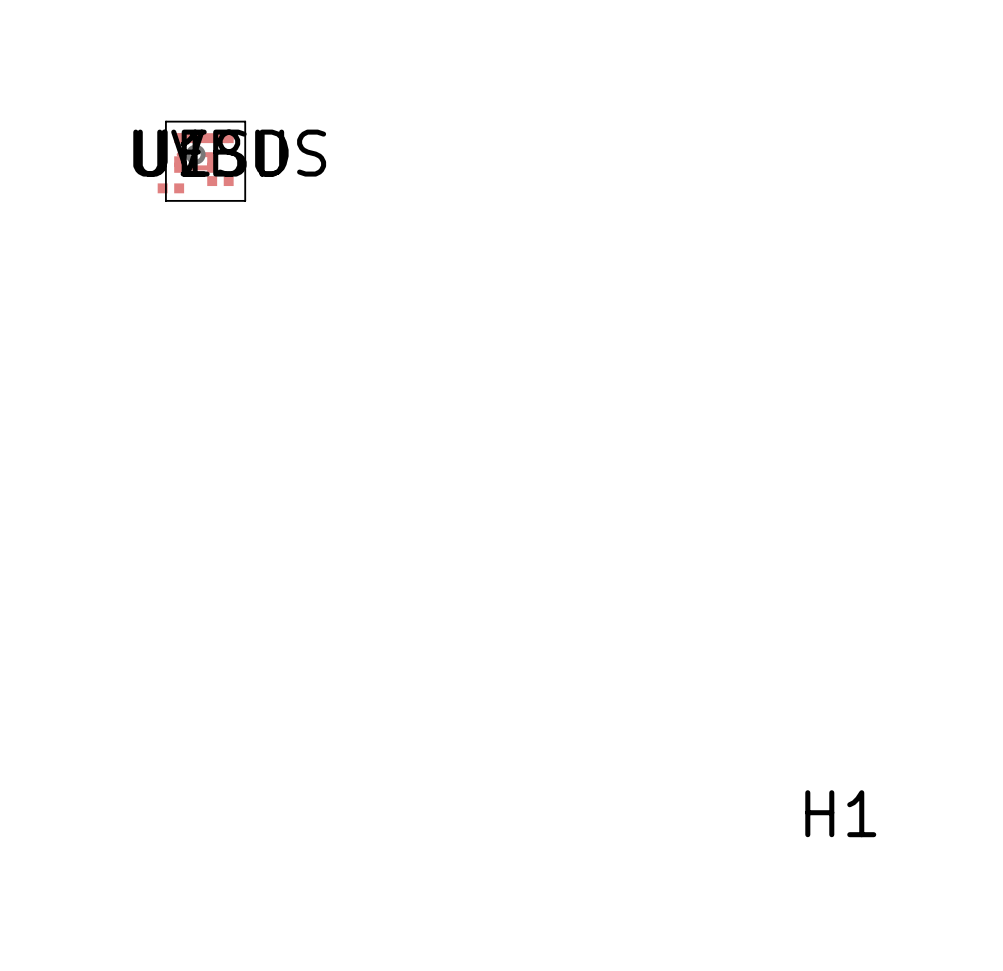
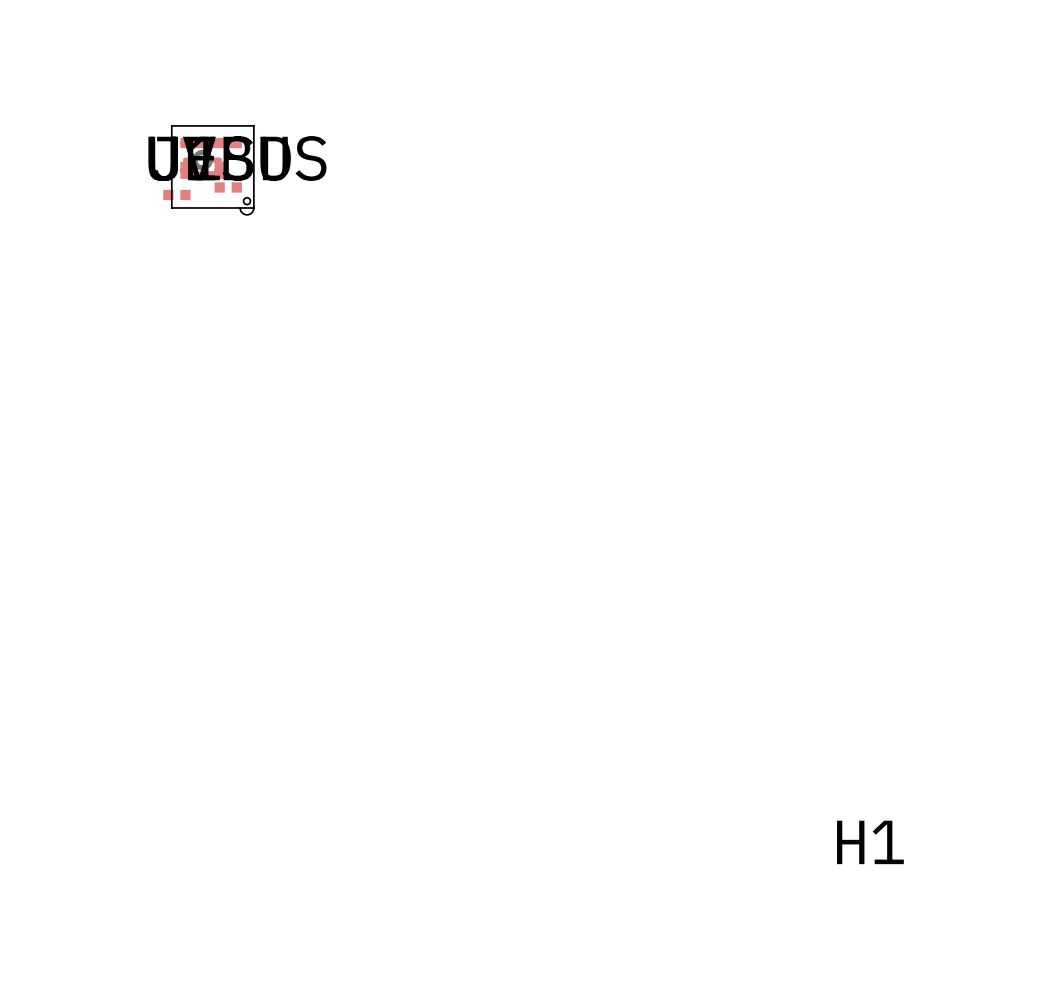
round board edge: none -> [242, 196, 252, 206]
board edge: none -> (240, 207) (242, 212) (247, 214) (251, 212) (253, 207)

